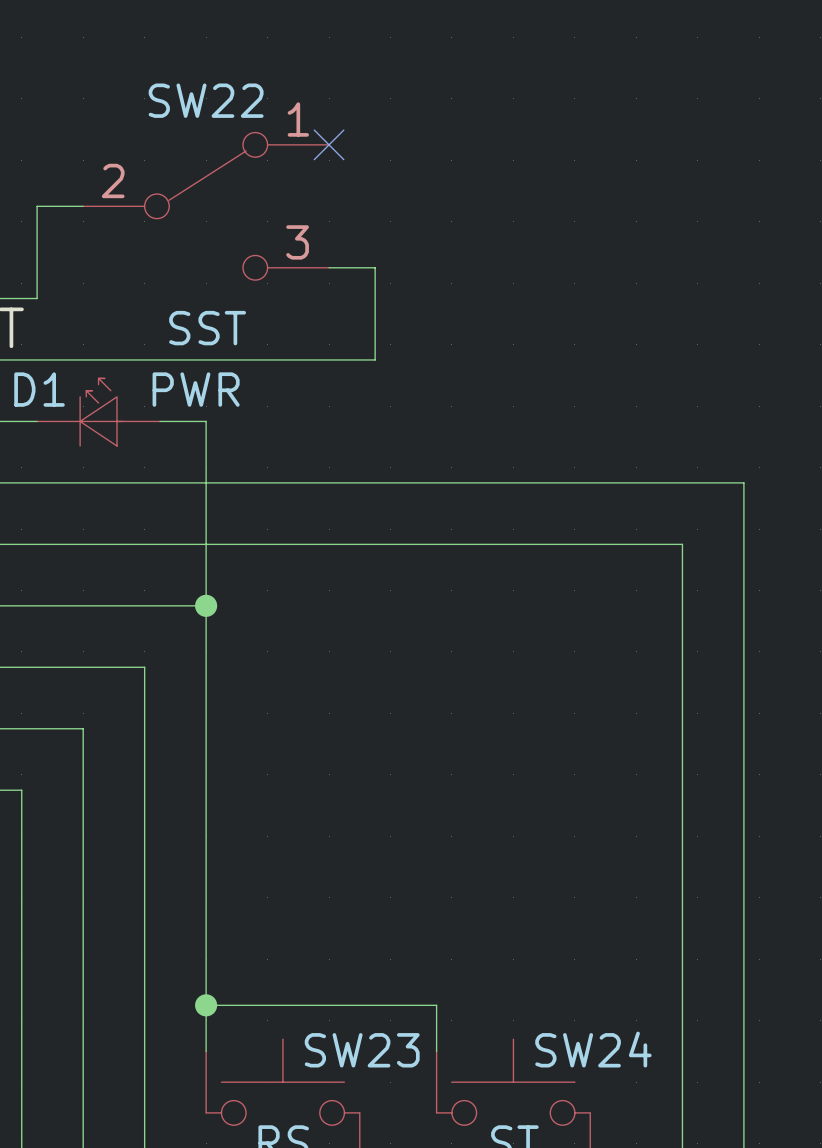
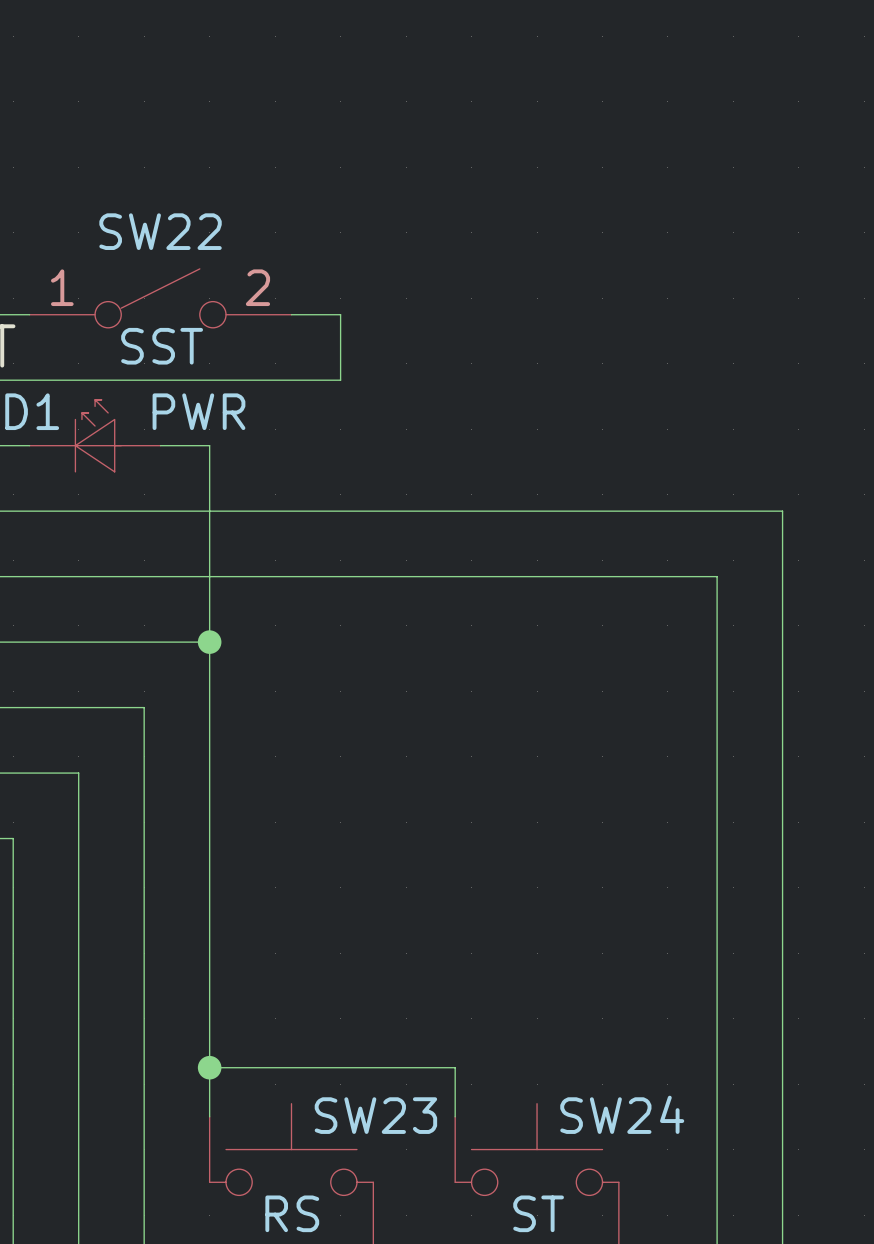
SW22 symbol: [83, 132, 330, 281] -> [29, 268, 292, 328]
no-connect mark: (329, 144) -> none
wire: (83, 206) (37, 206) (37, 298) -> none
wire: (329, 267) (375, 267) (375, 359) (329, 359) -> (291, 314) (340, 314) (340, 380)
SW22 value position: SST (207, 328) -> SST (162, 346)

